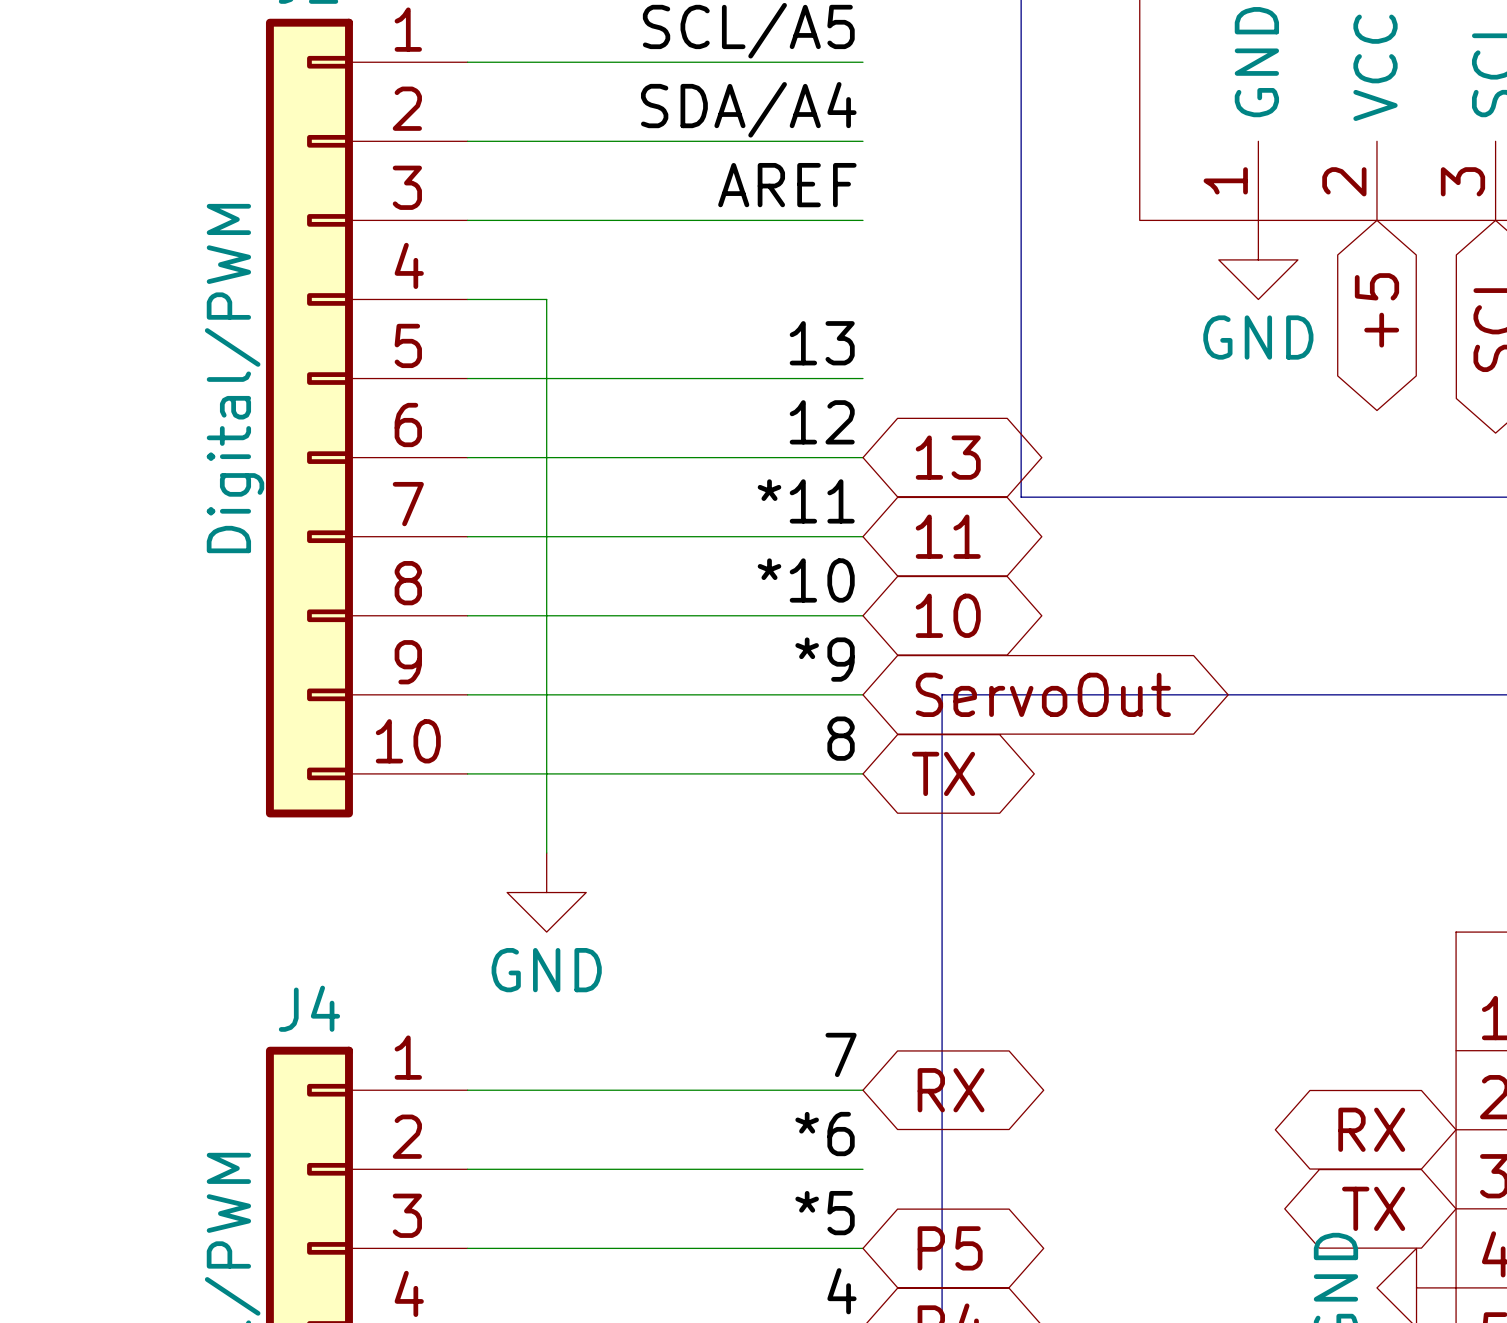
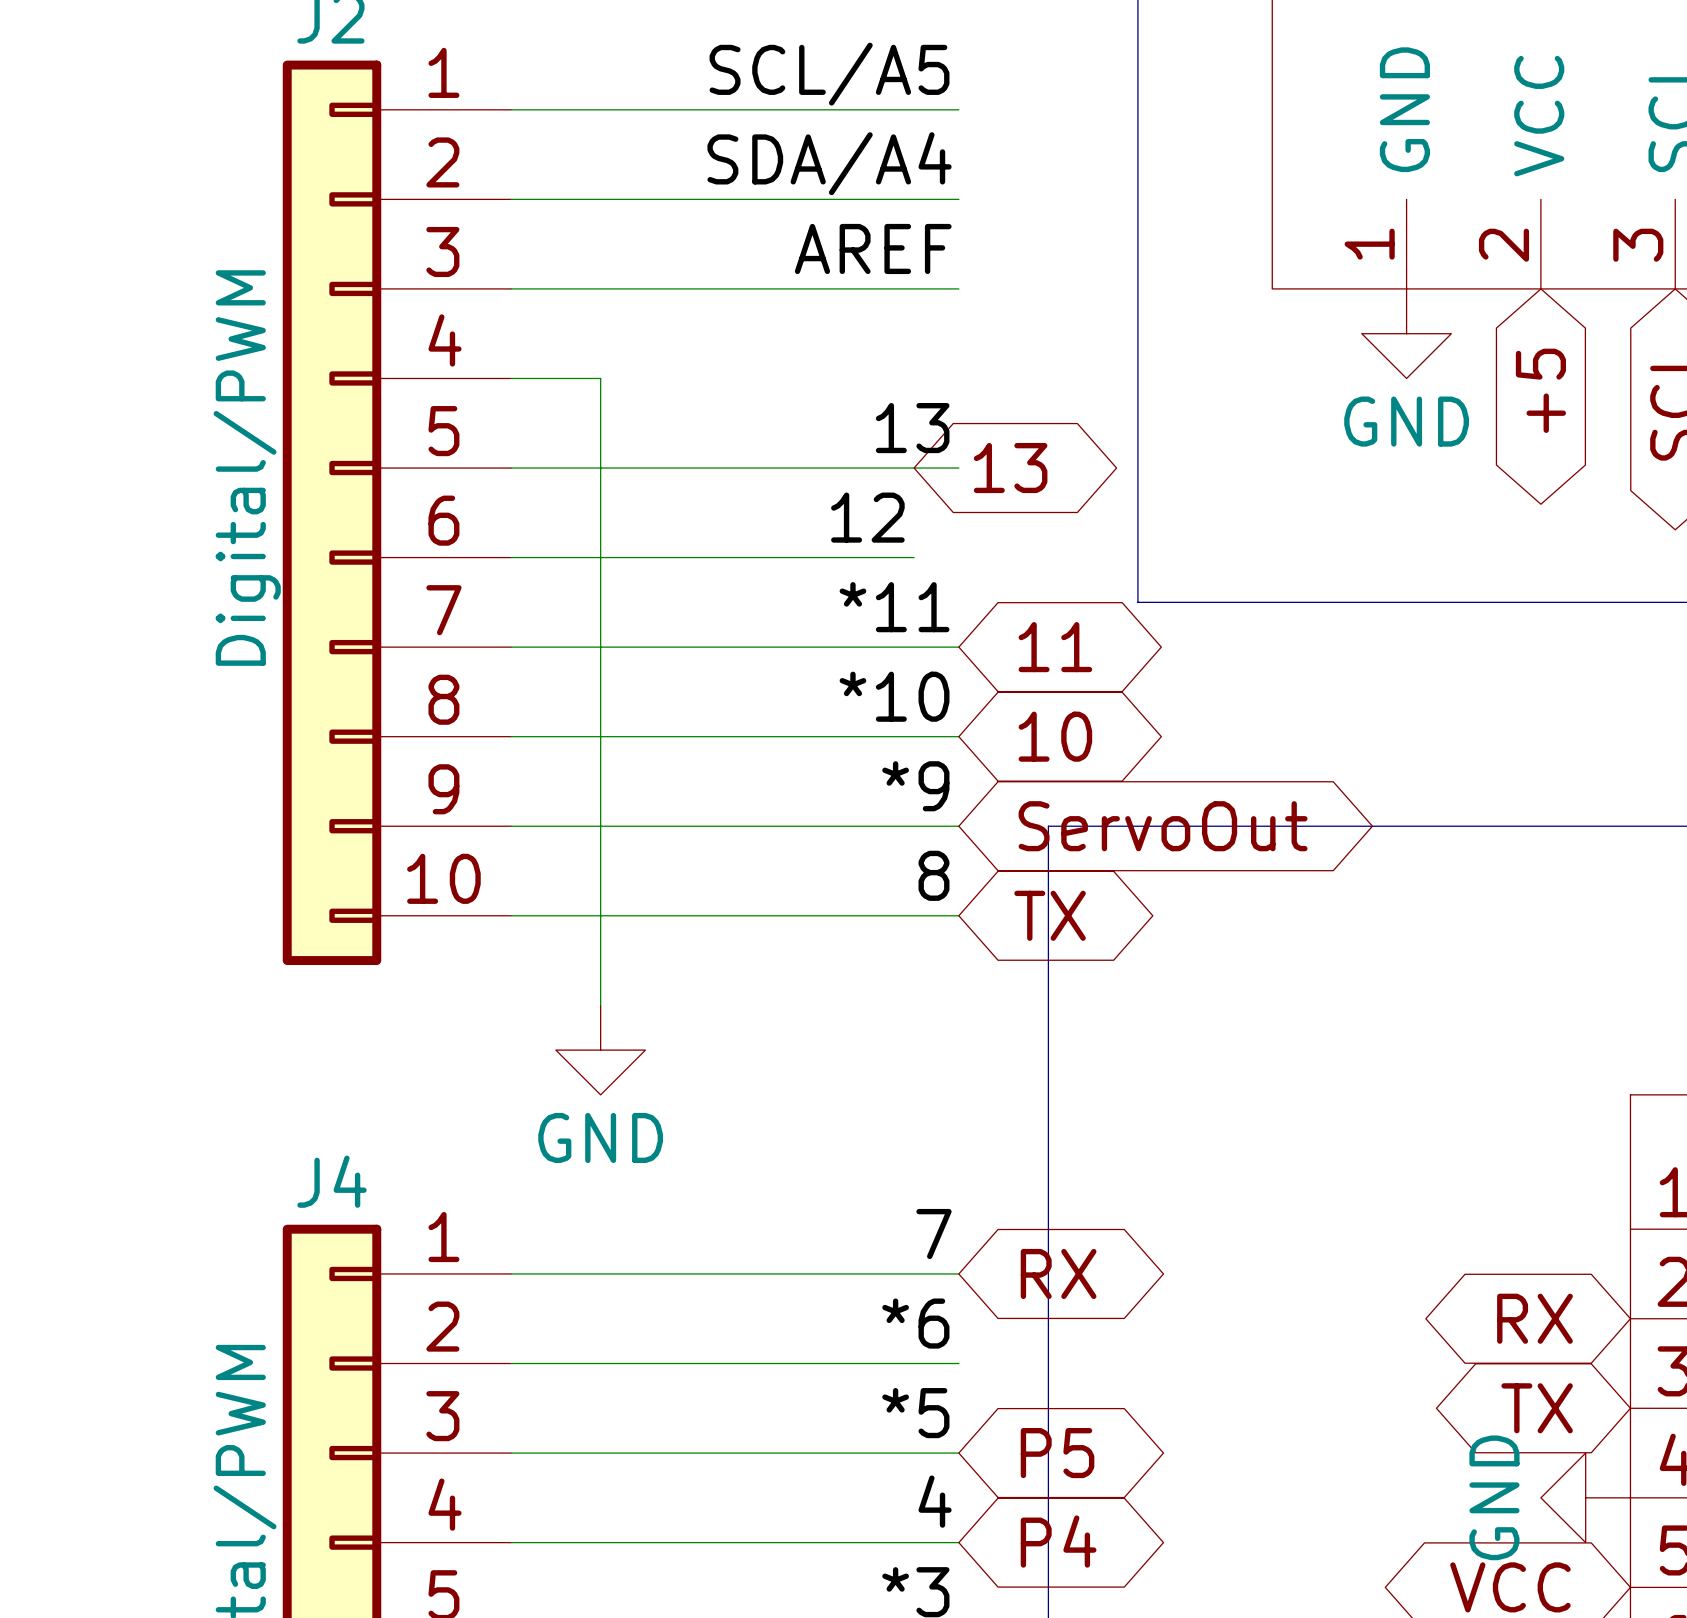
label position: 12 (822, 422) -> 12 (867, 517)
wire: (823, 457) (862, 457) -> none
global label position: 13 (948, 457) -> 13 (1010, 468)

